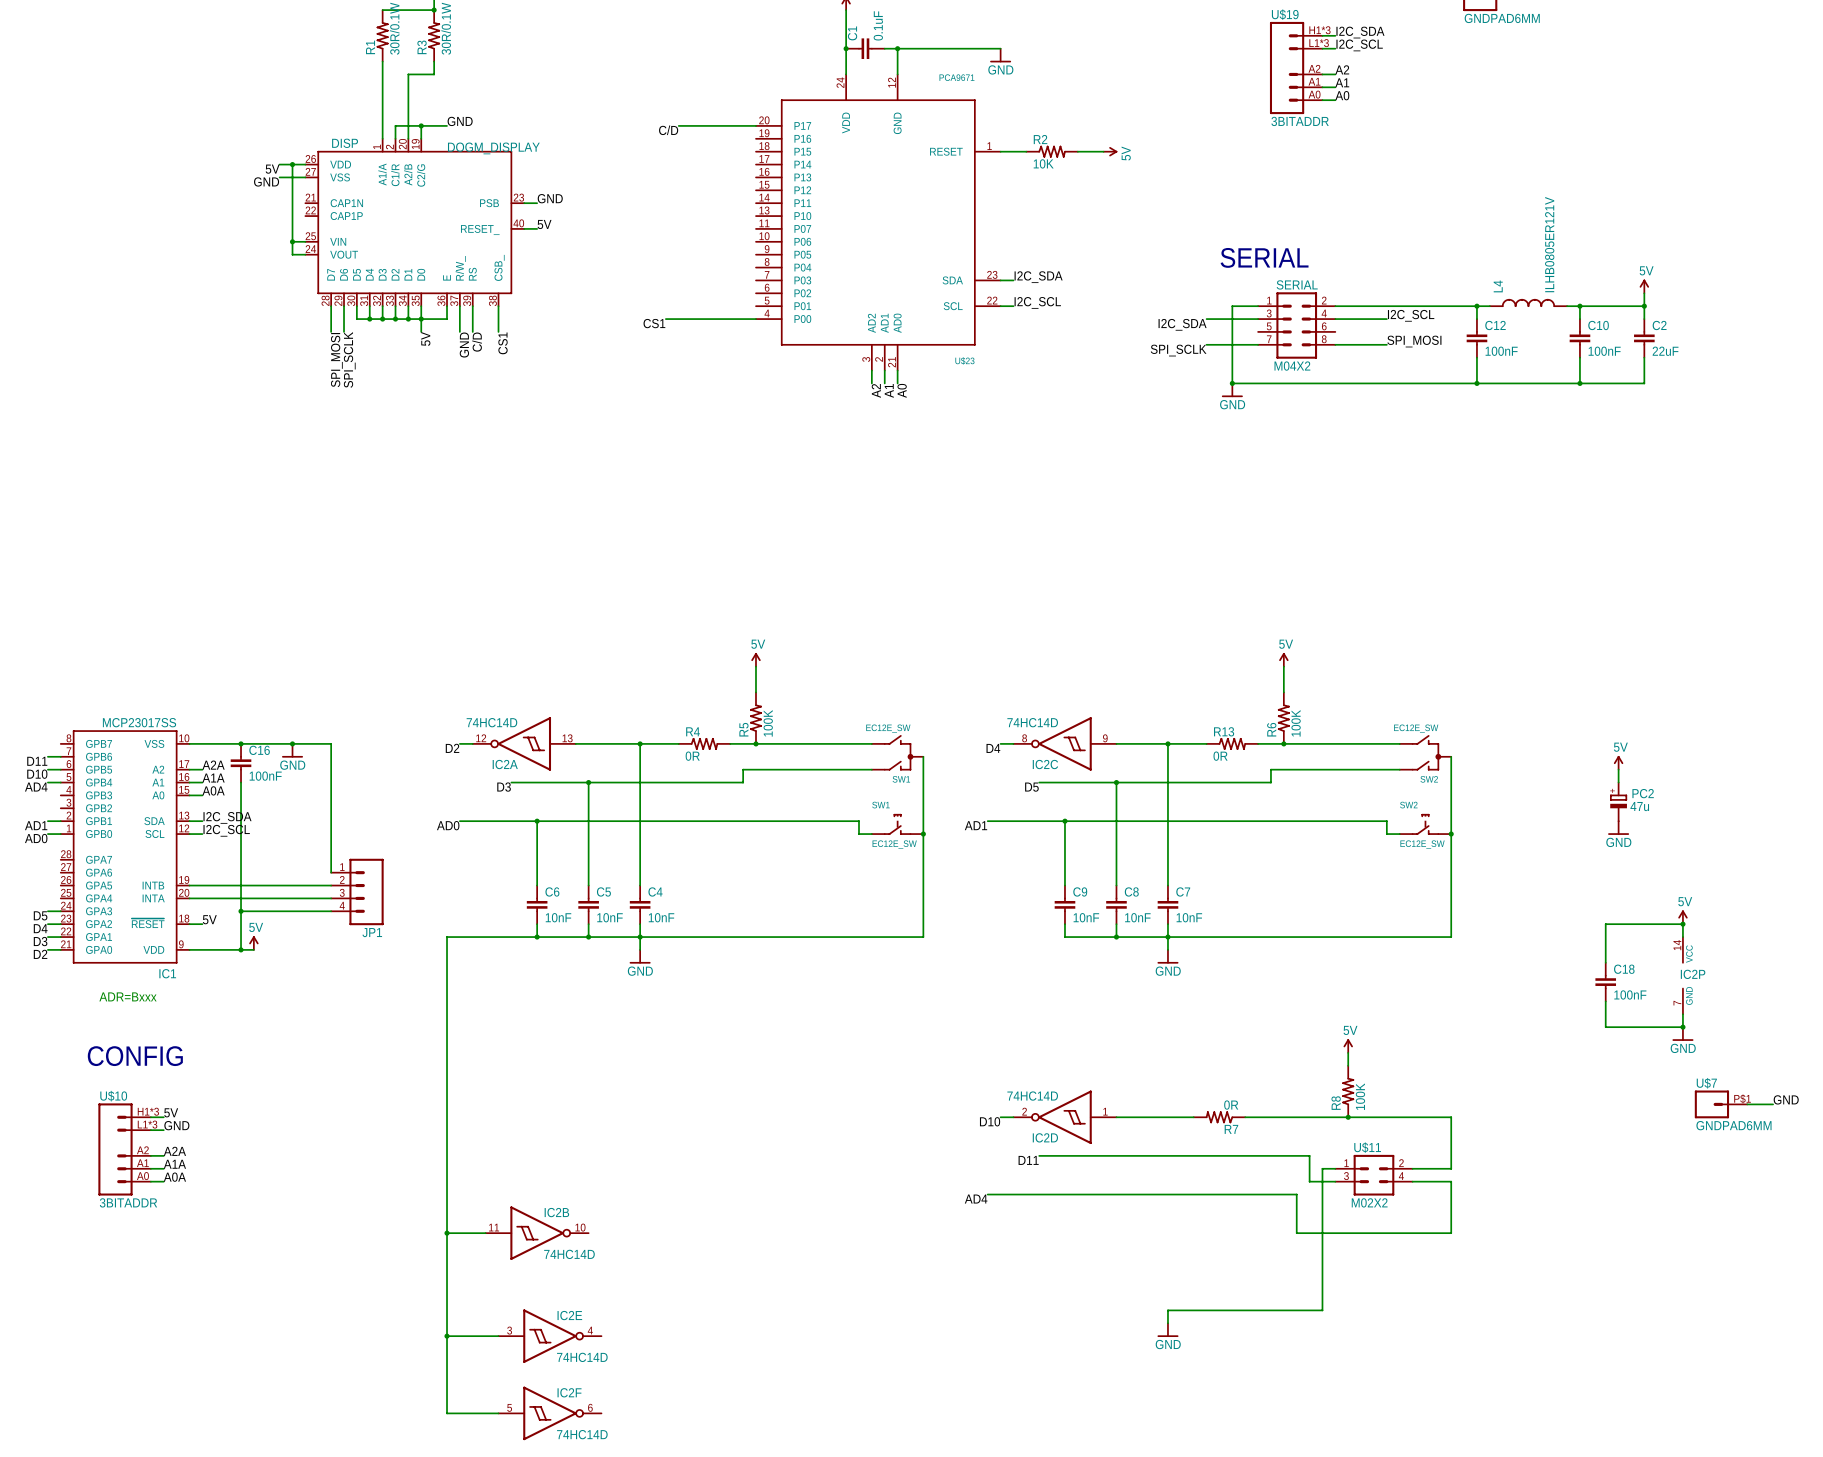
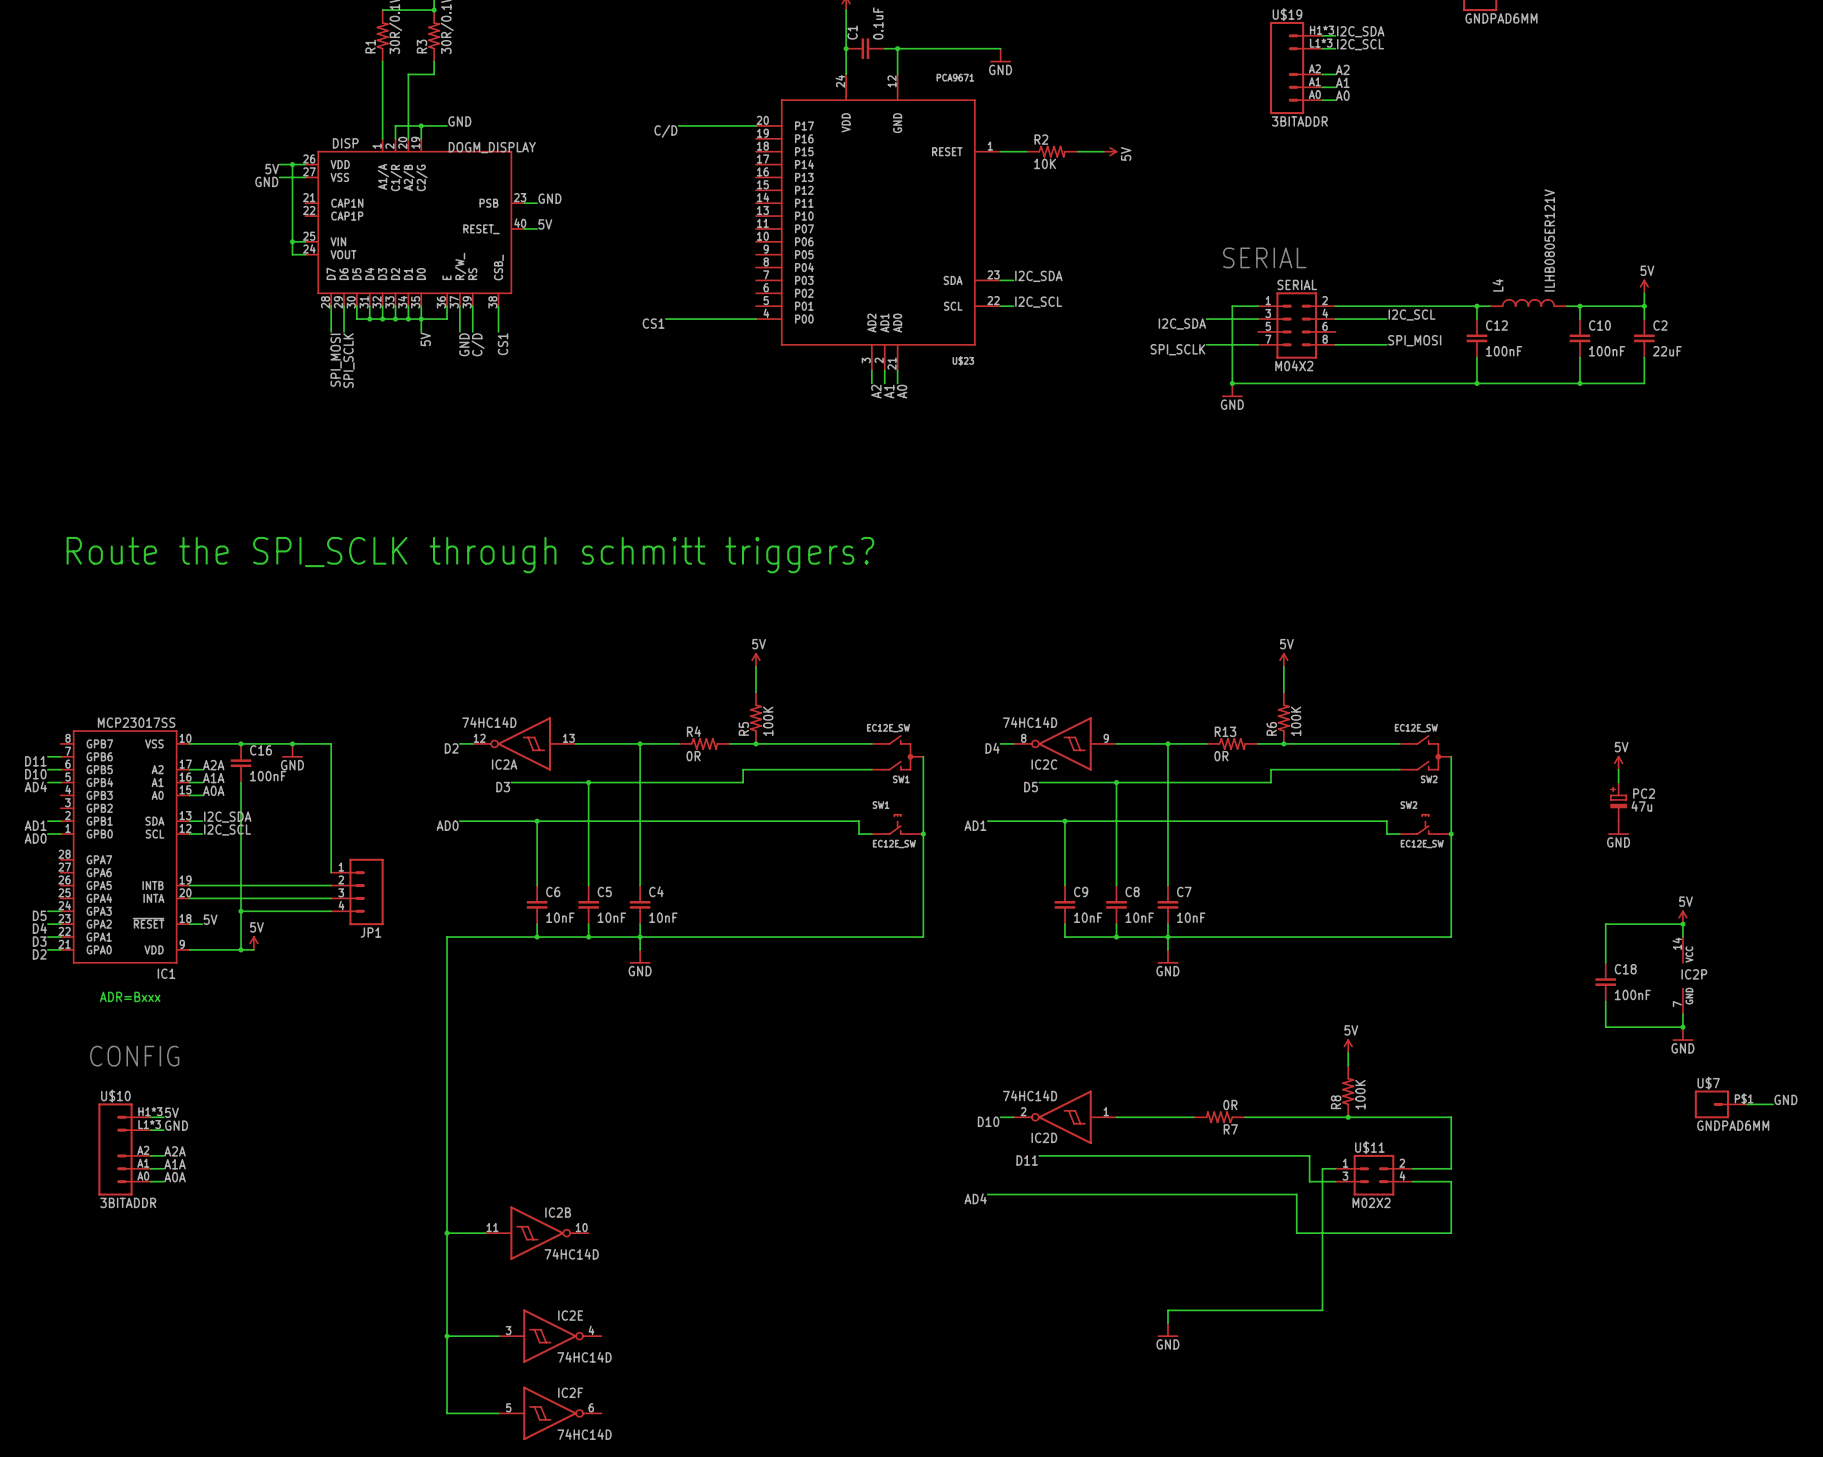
text: none -> Route the SPI_SCLK through schmitt triggers? (470, 555)

